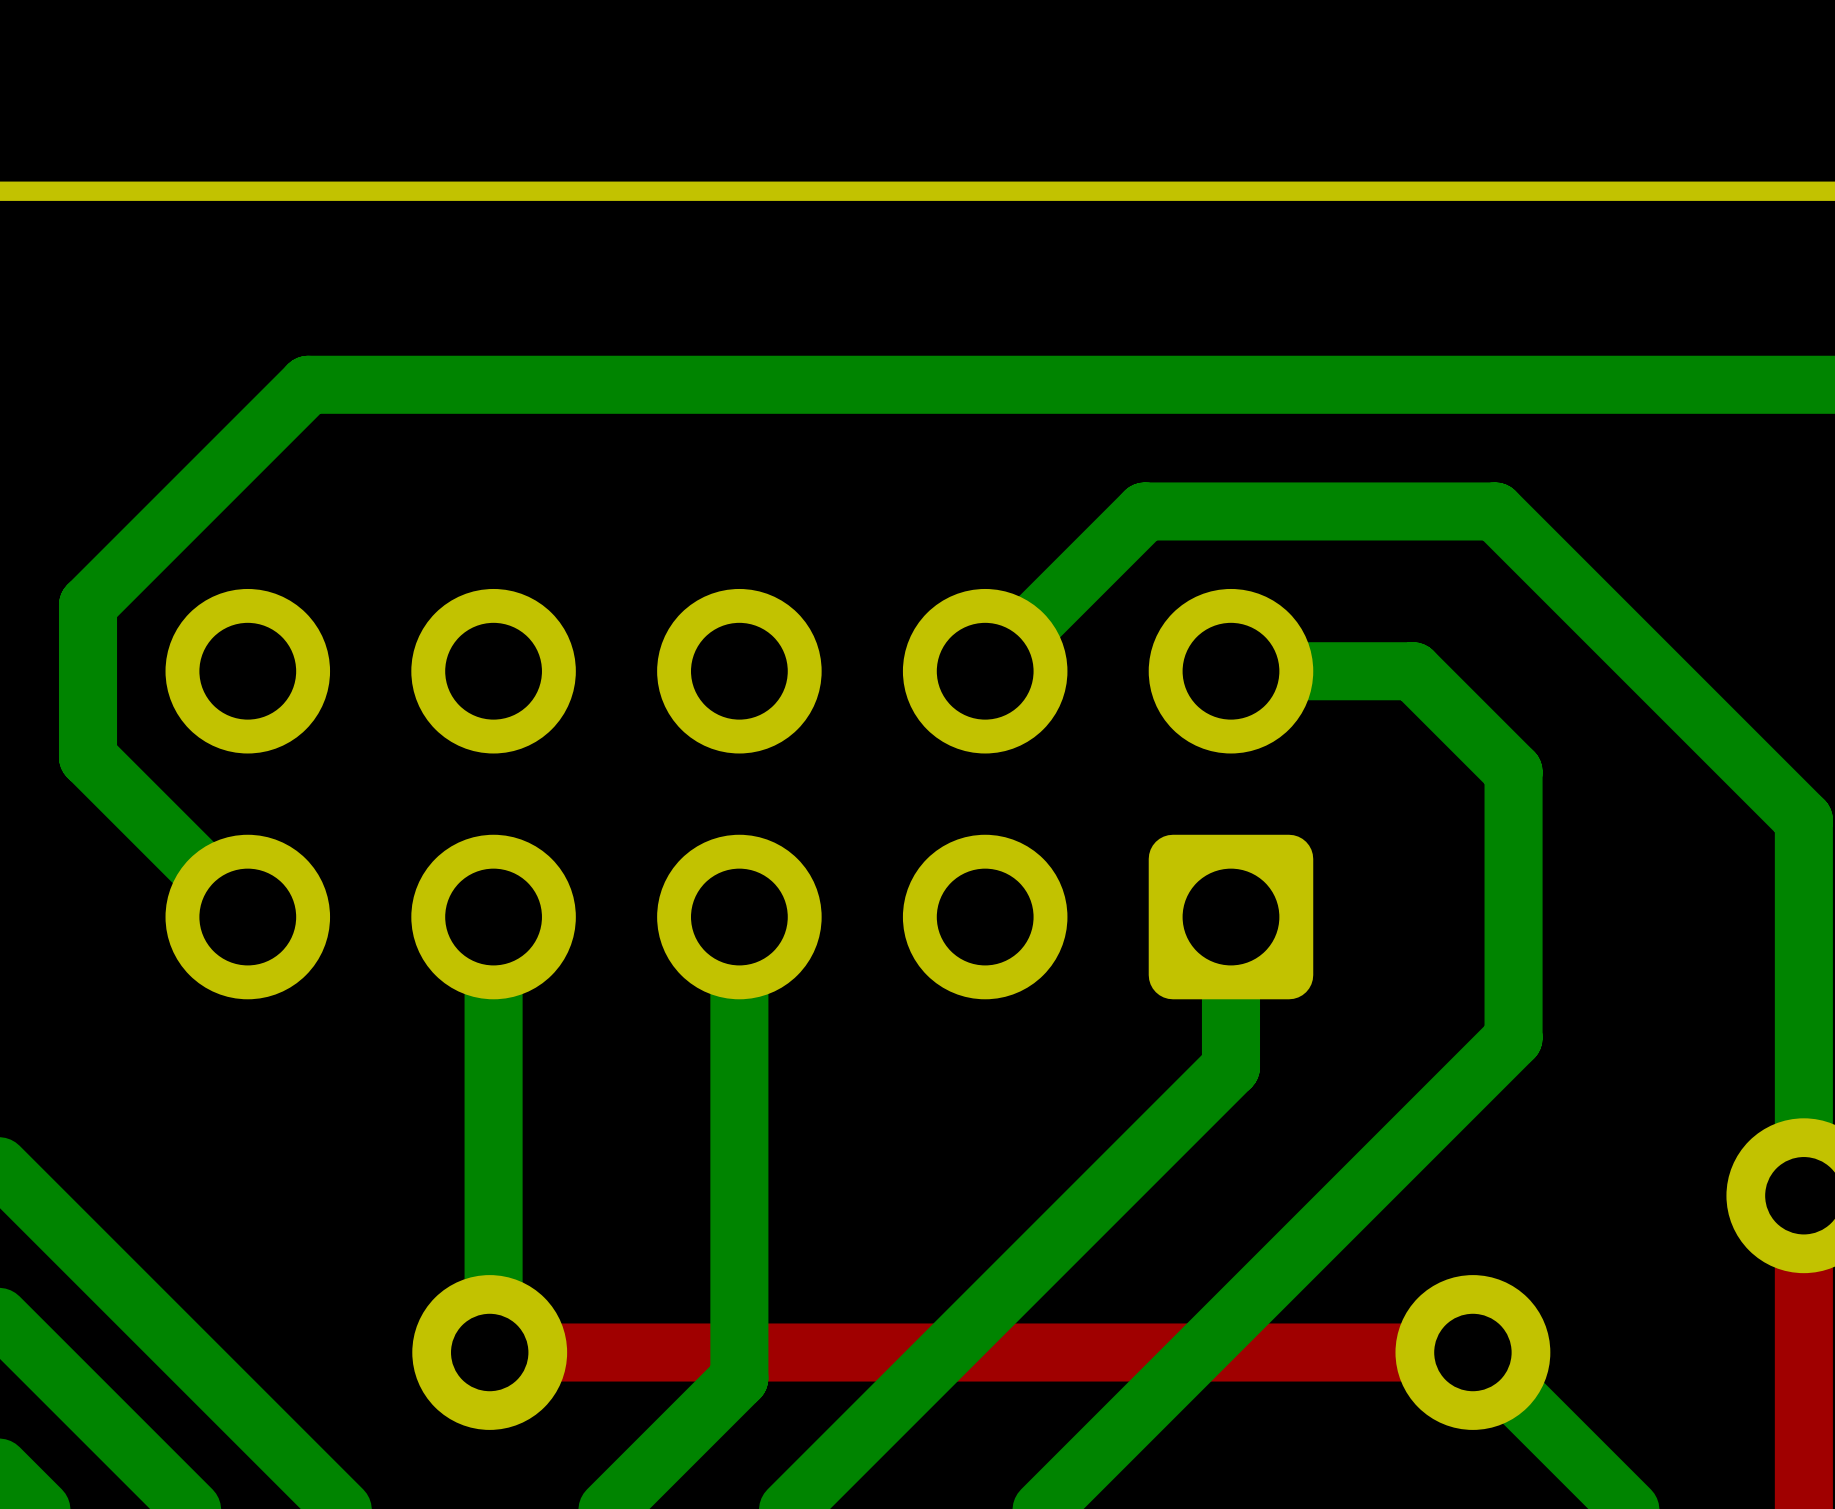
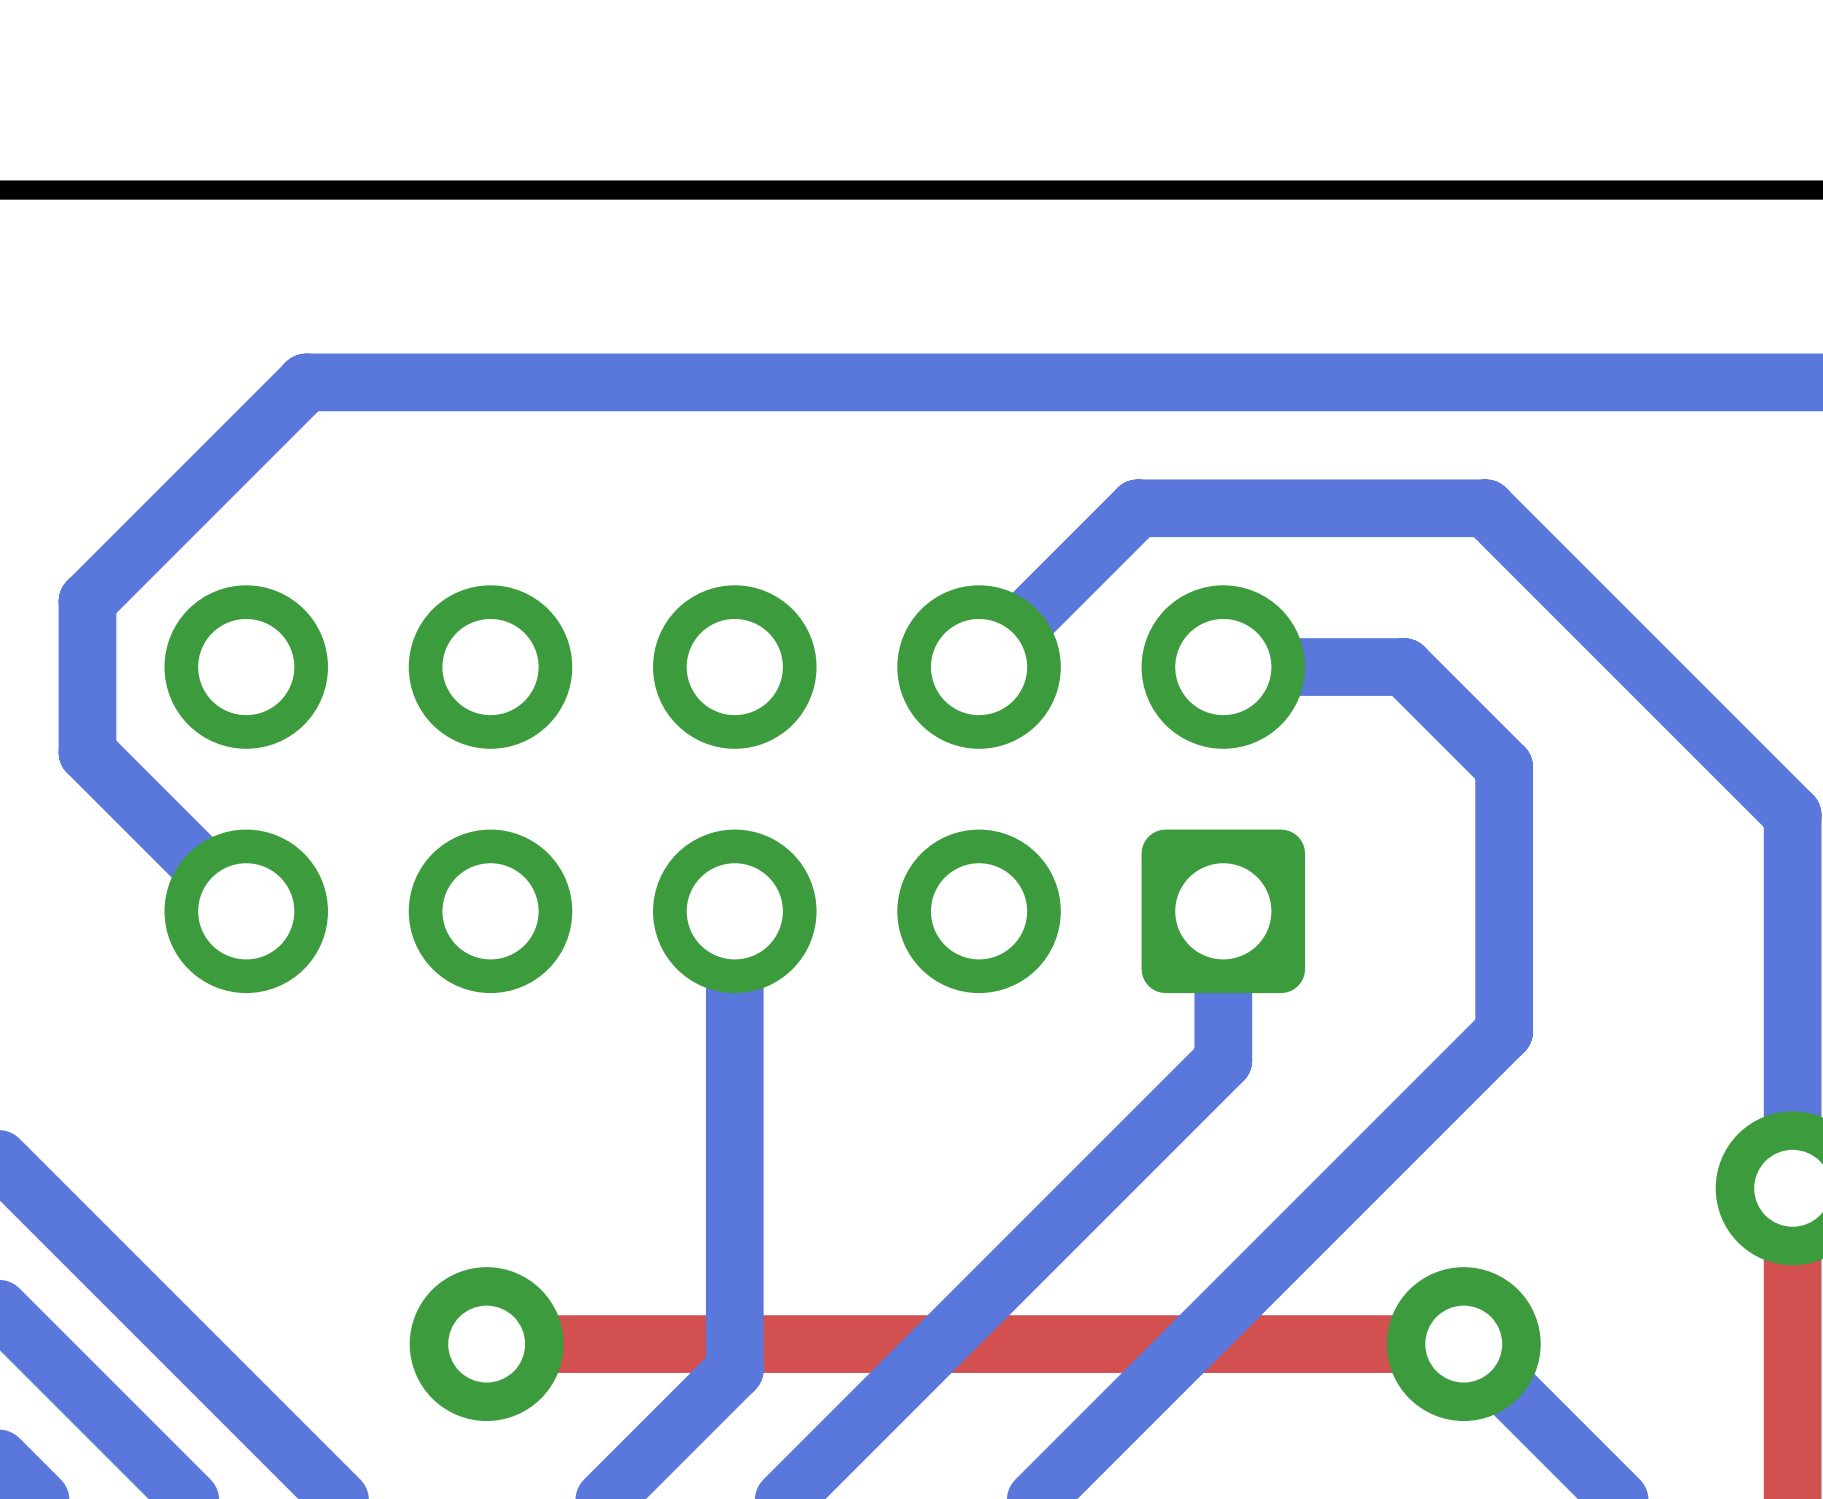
bottom track: (493, 917) (493, 1348) (489, 1352) -> none

